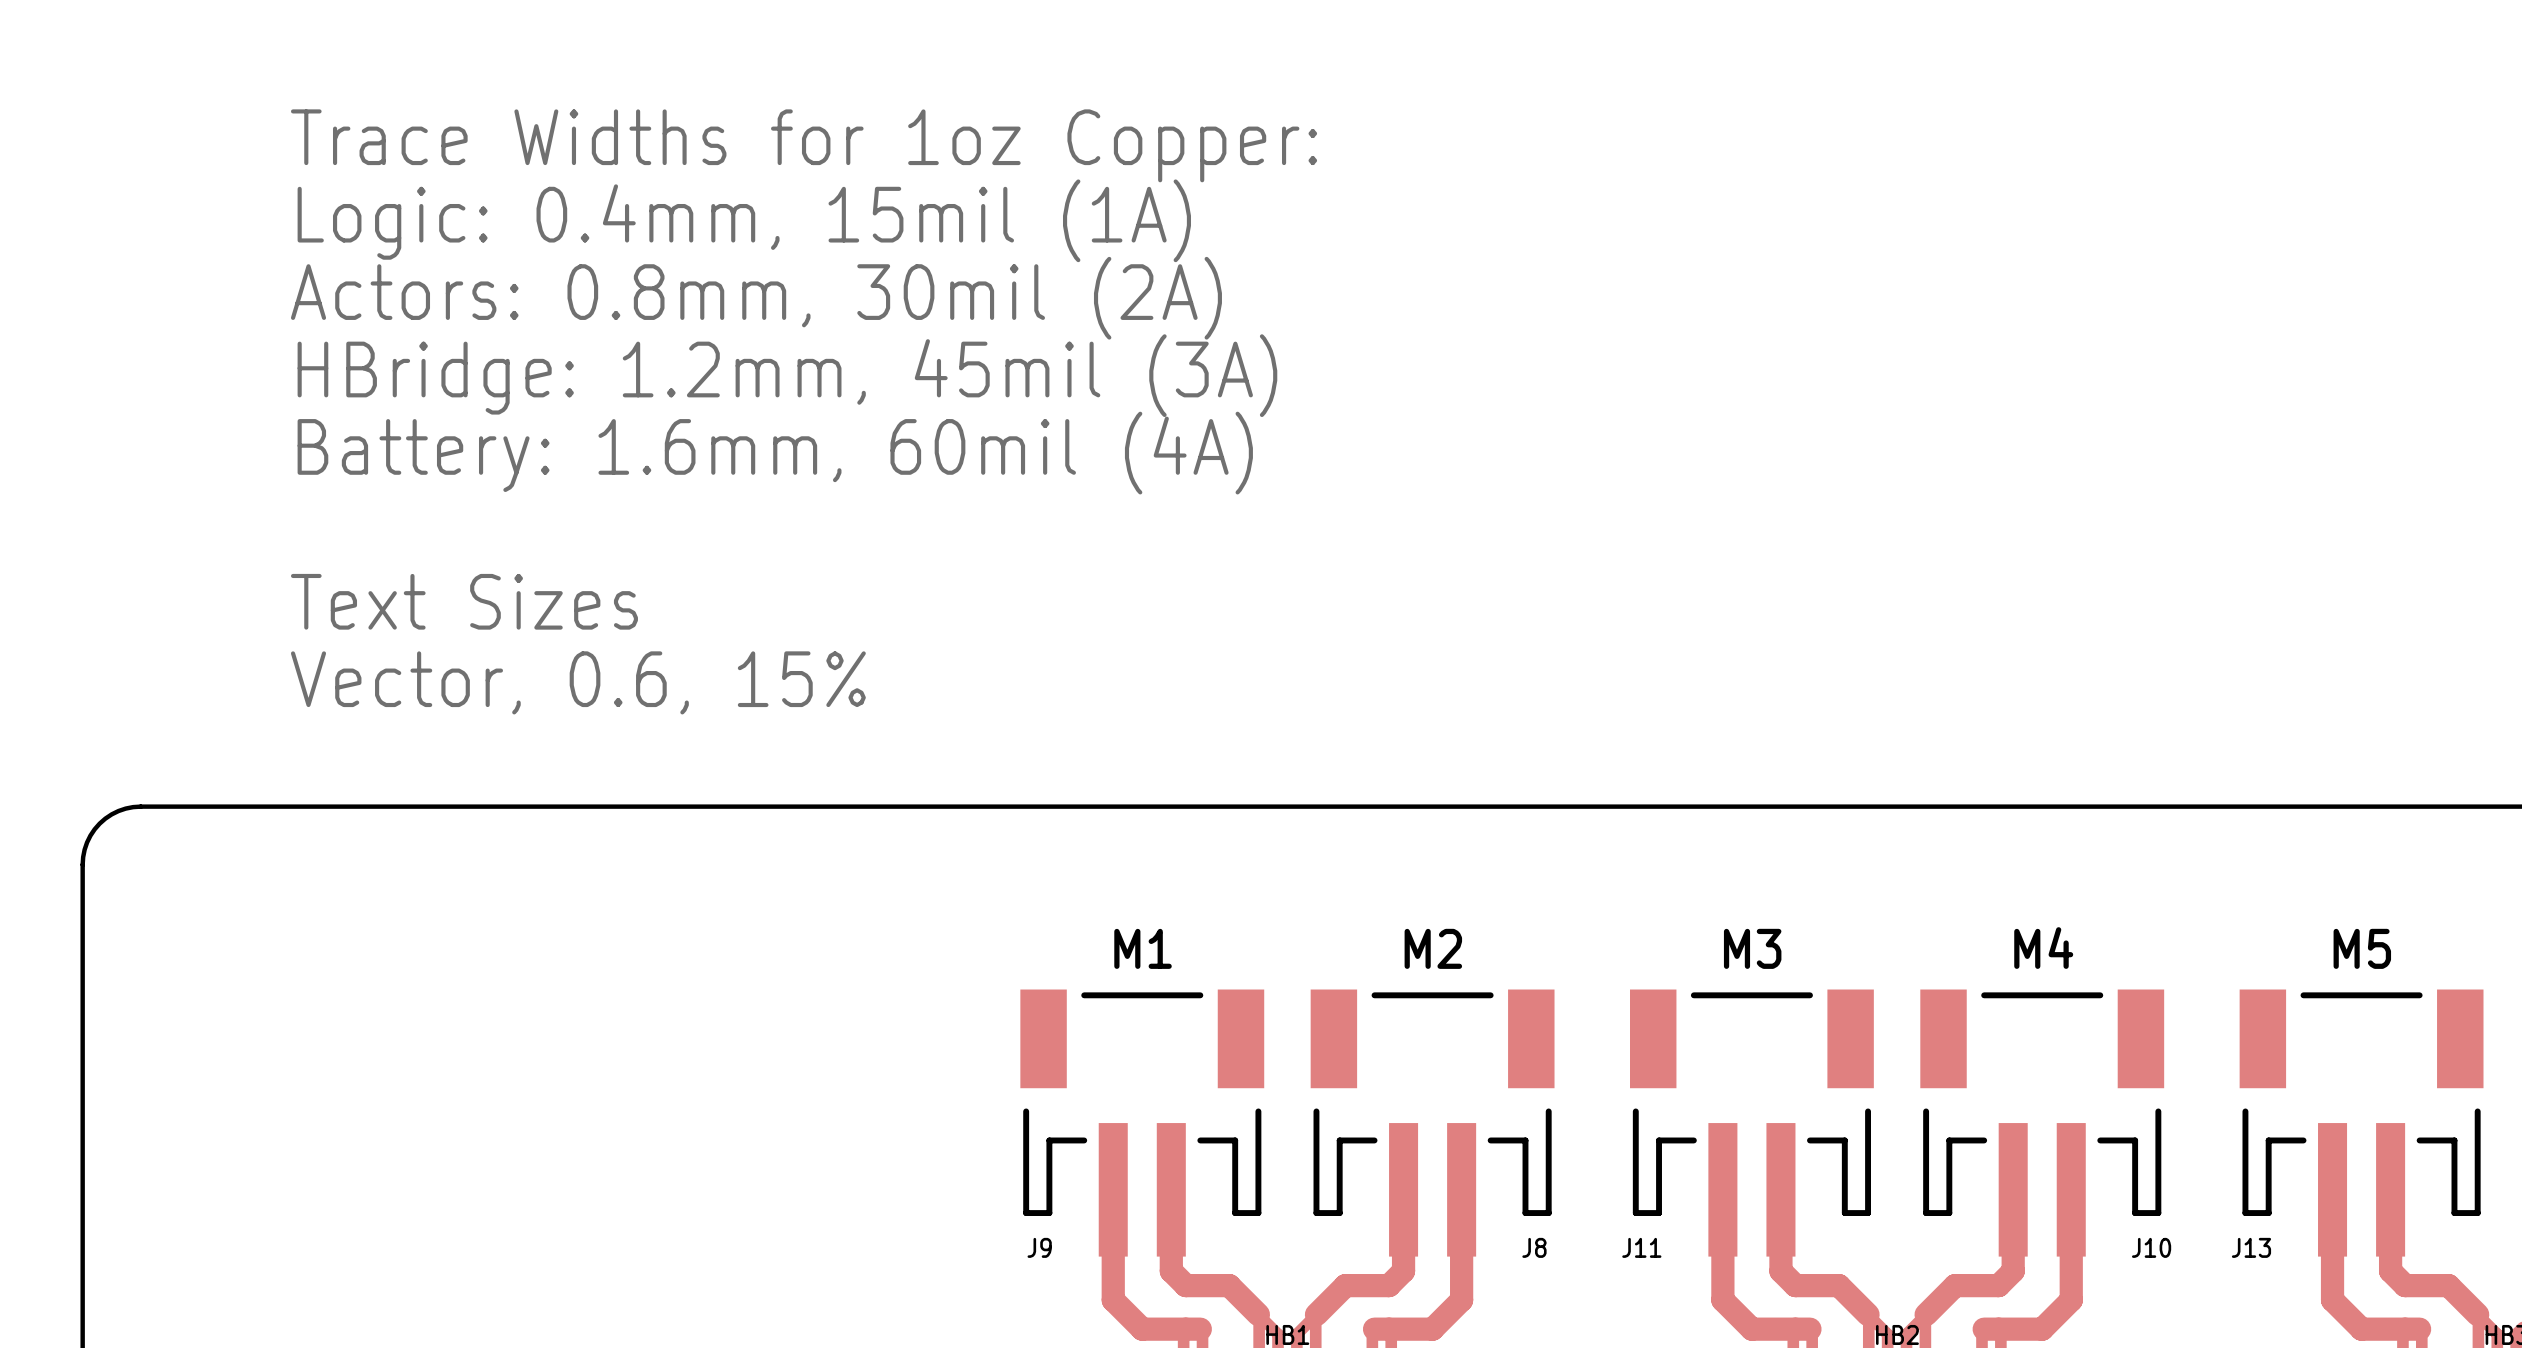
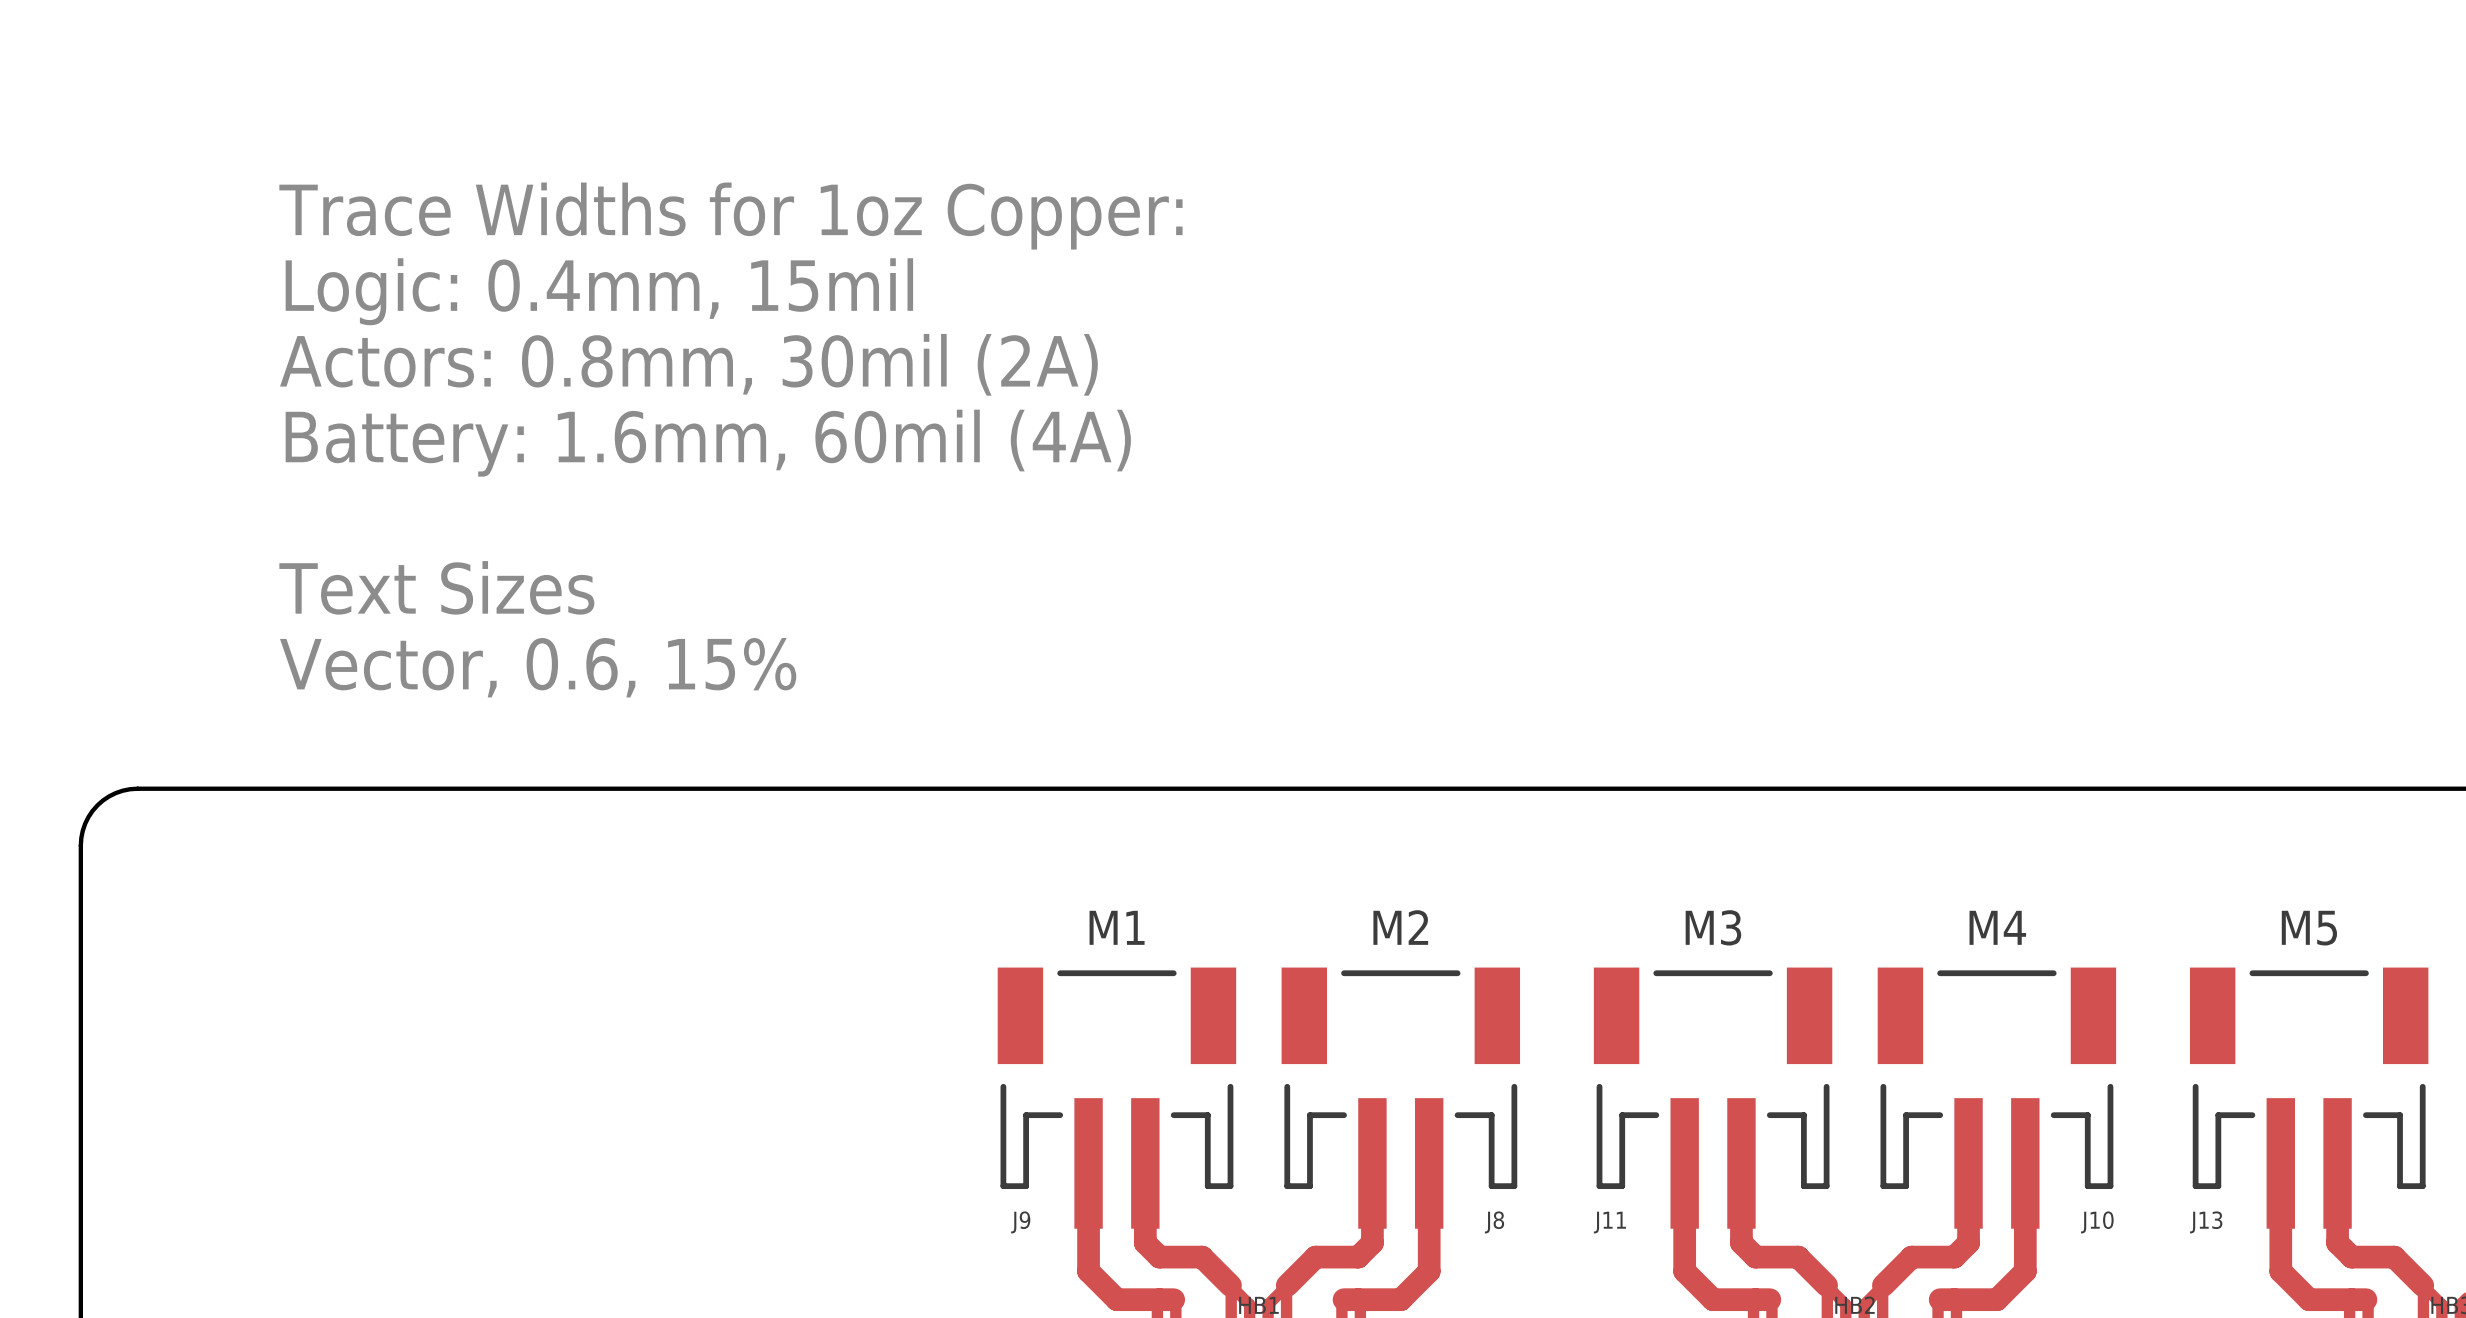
text: Trace Widths for 1oz Copper: (804, 145) -> none
text: Logic: 0.4mm, 15mil (1A) (744, 220) -> Trace Widths for 1oz Copper: (730, 216)
text: Actors: 0.8mm, 30mil (2A) (756, 298) -> Logic: 0.4mm, 15mil (599, 291)
text: HBridge: 1.2mm, 45mil (3A) (787, 375) -> Actors: 0.8mm, 30mil (2A) (688, 364)

